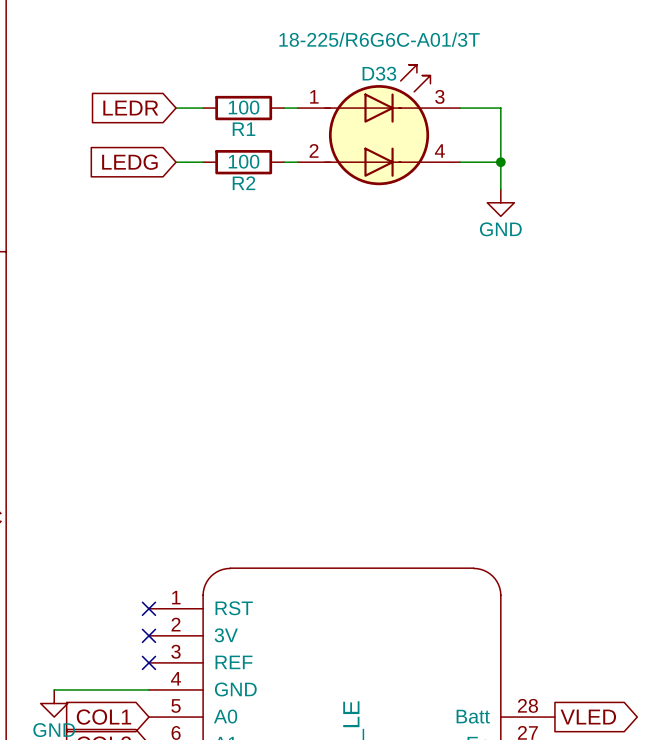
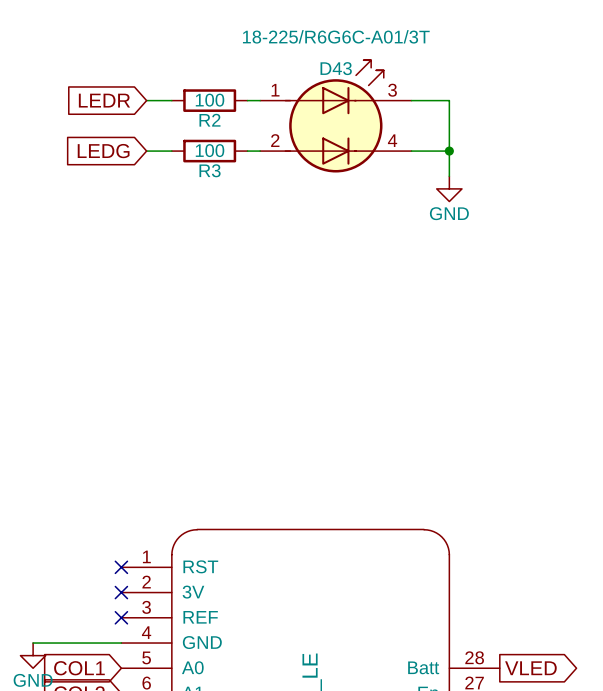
D33 name: D33 (379, 73) -> D43 (336, 68)
R1 name: R1 (244, 129) -> R2 (209, 120)
R2 name: R2 (244, 183) -> R3 (210, 170)

